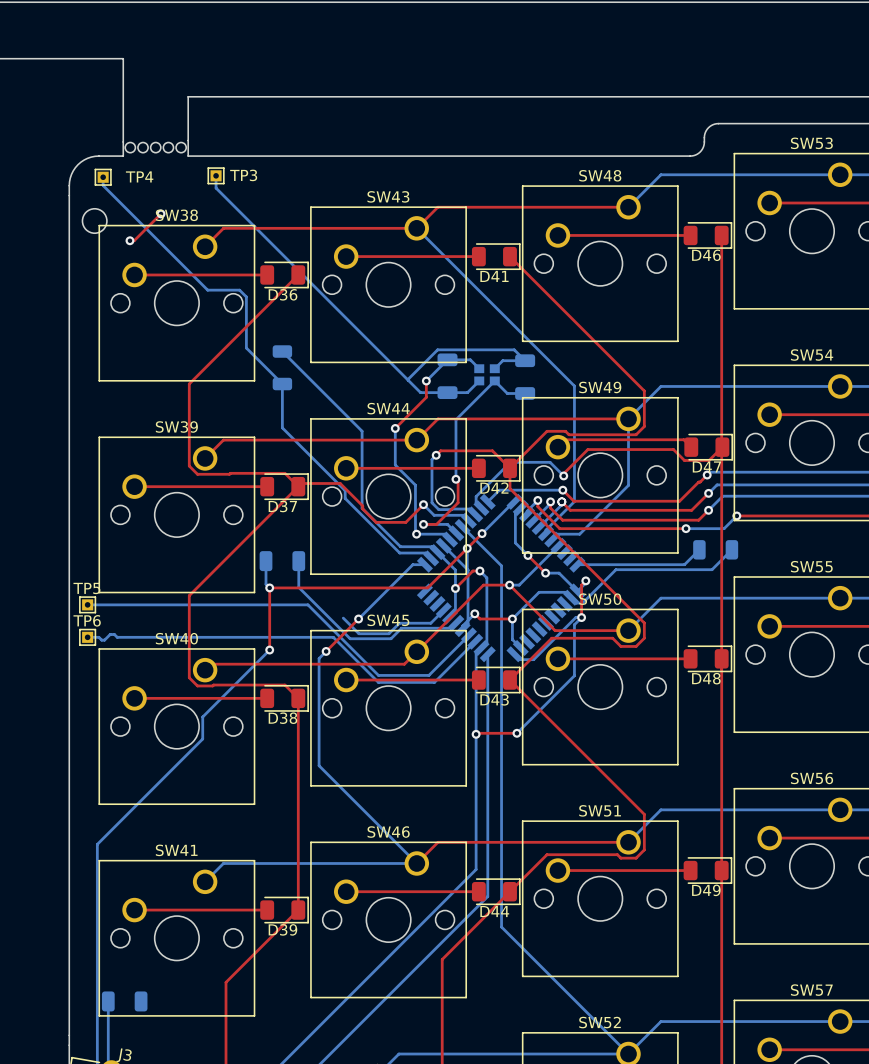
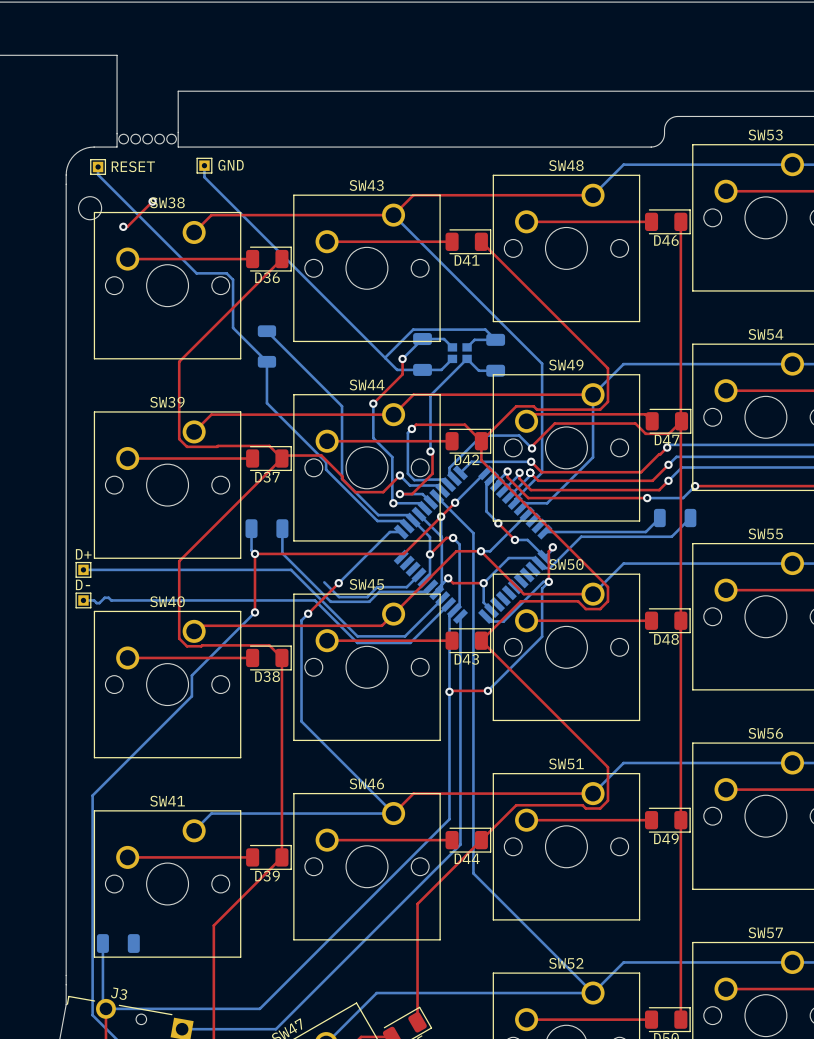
TP3 name: TP3 (243, 175) -> GND (231, 165)
TP4 name: TP4 (139, 176) -> RESET (133, 166)
TP5 name: TP5 (86, 588) -> D+ (83, 554)
TP6 name: TP6 (87, 620) -> D- (83, 584)

